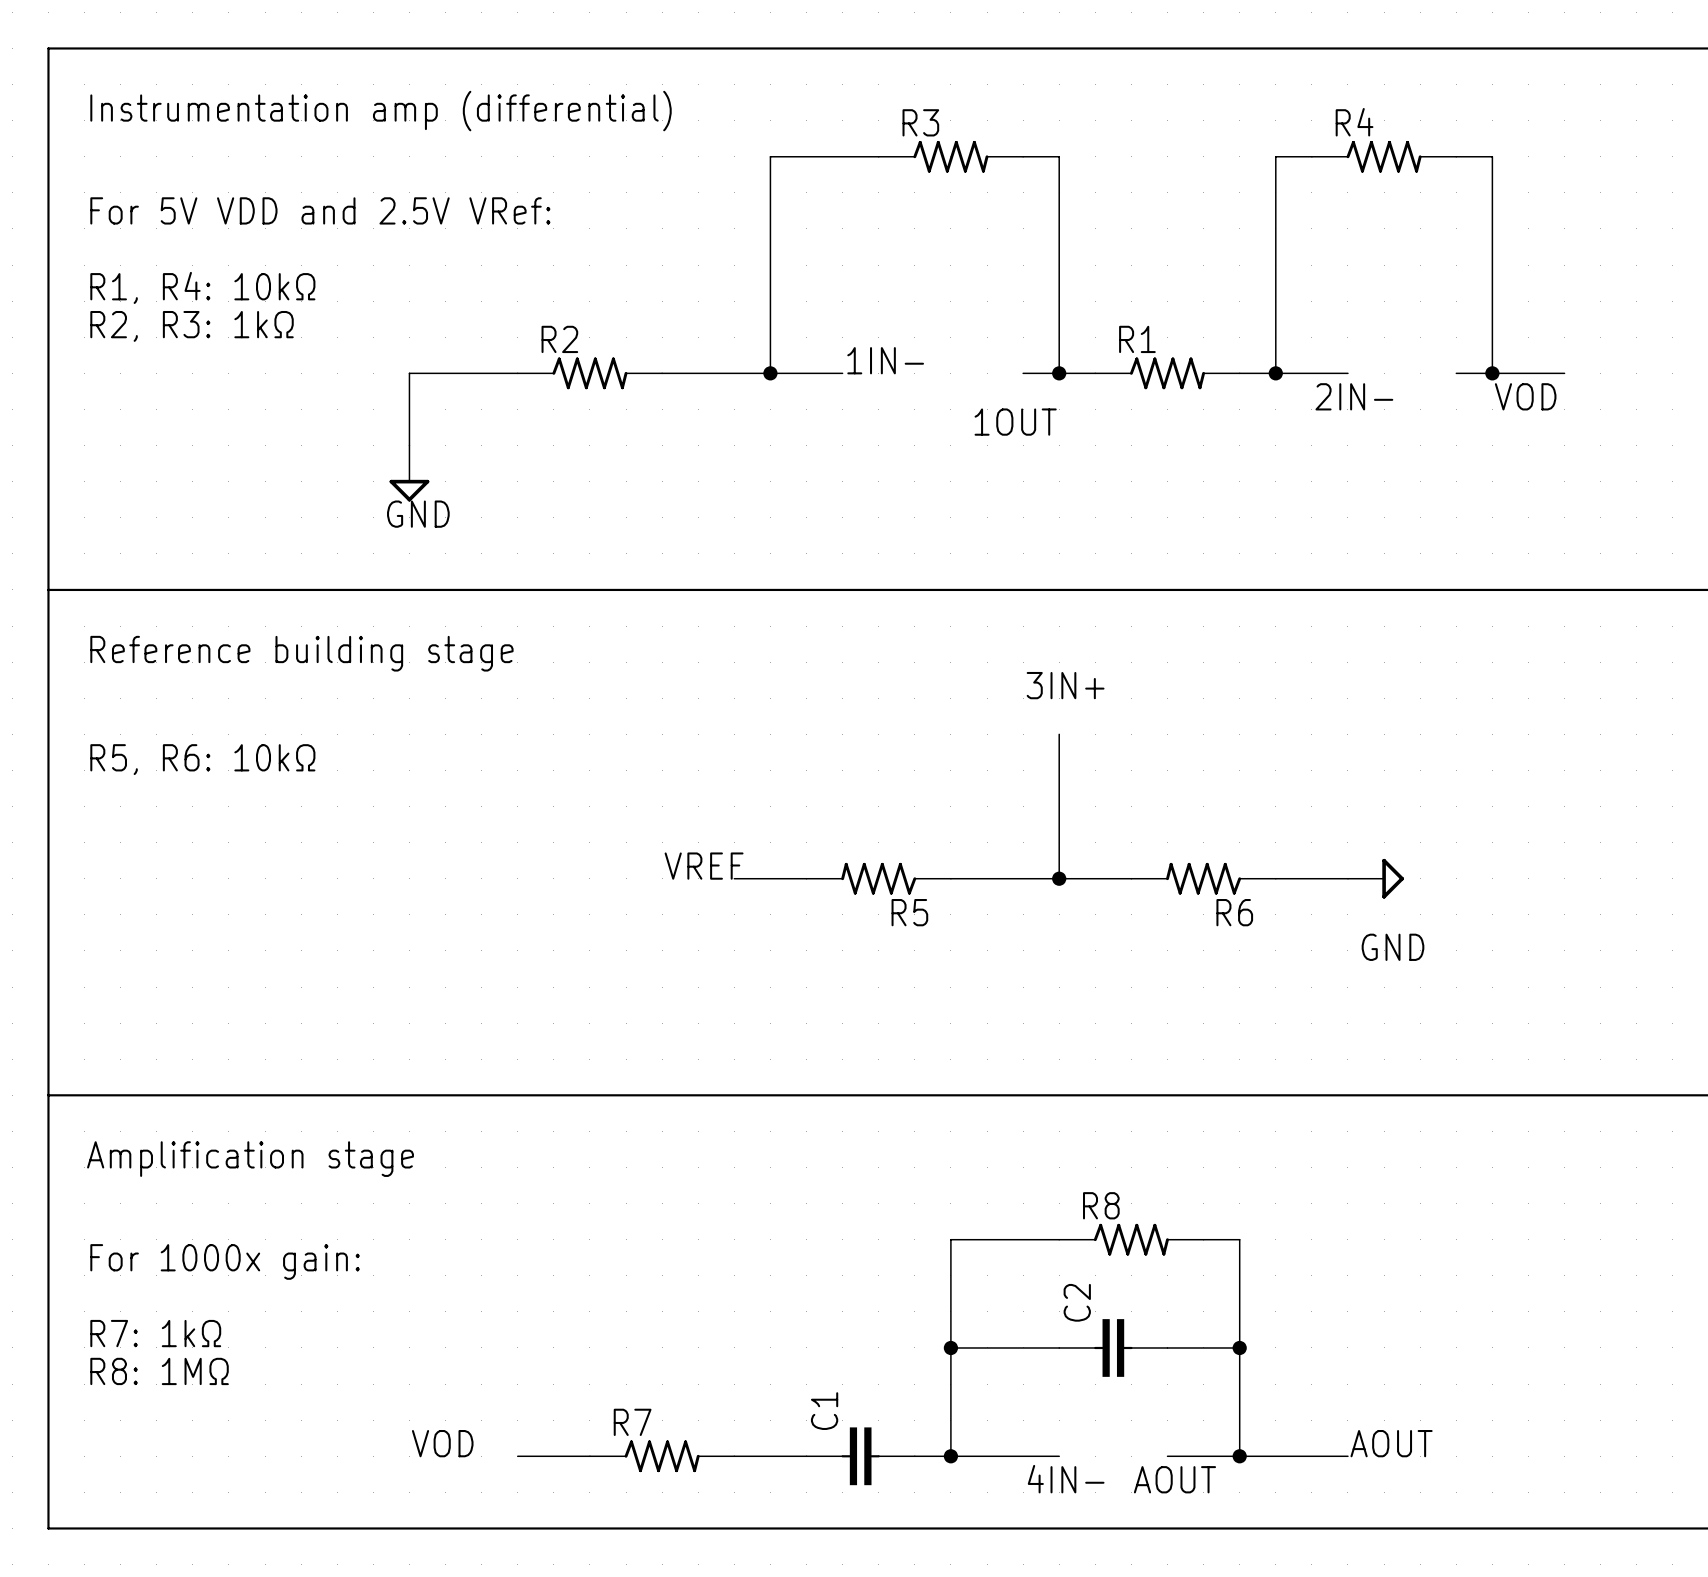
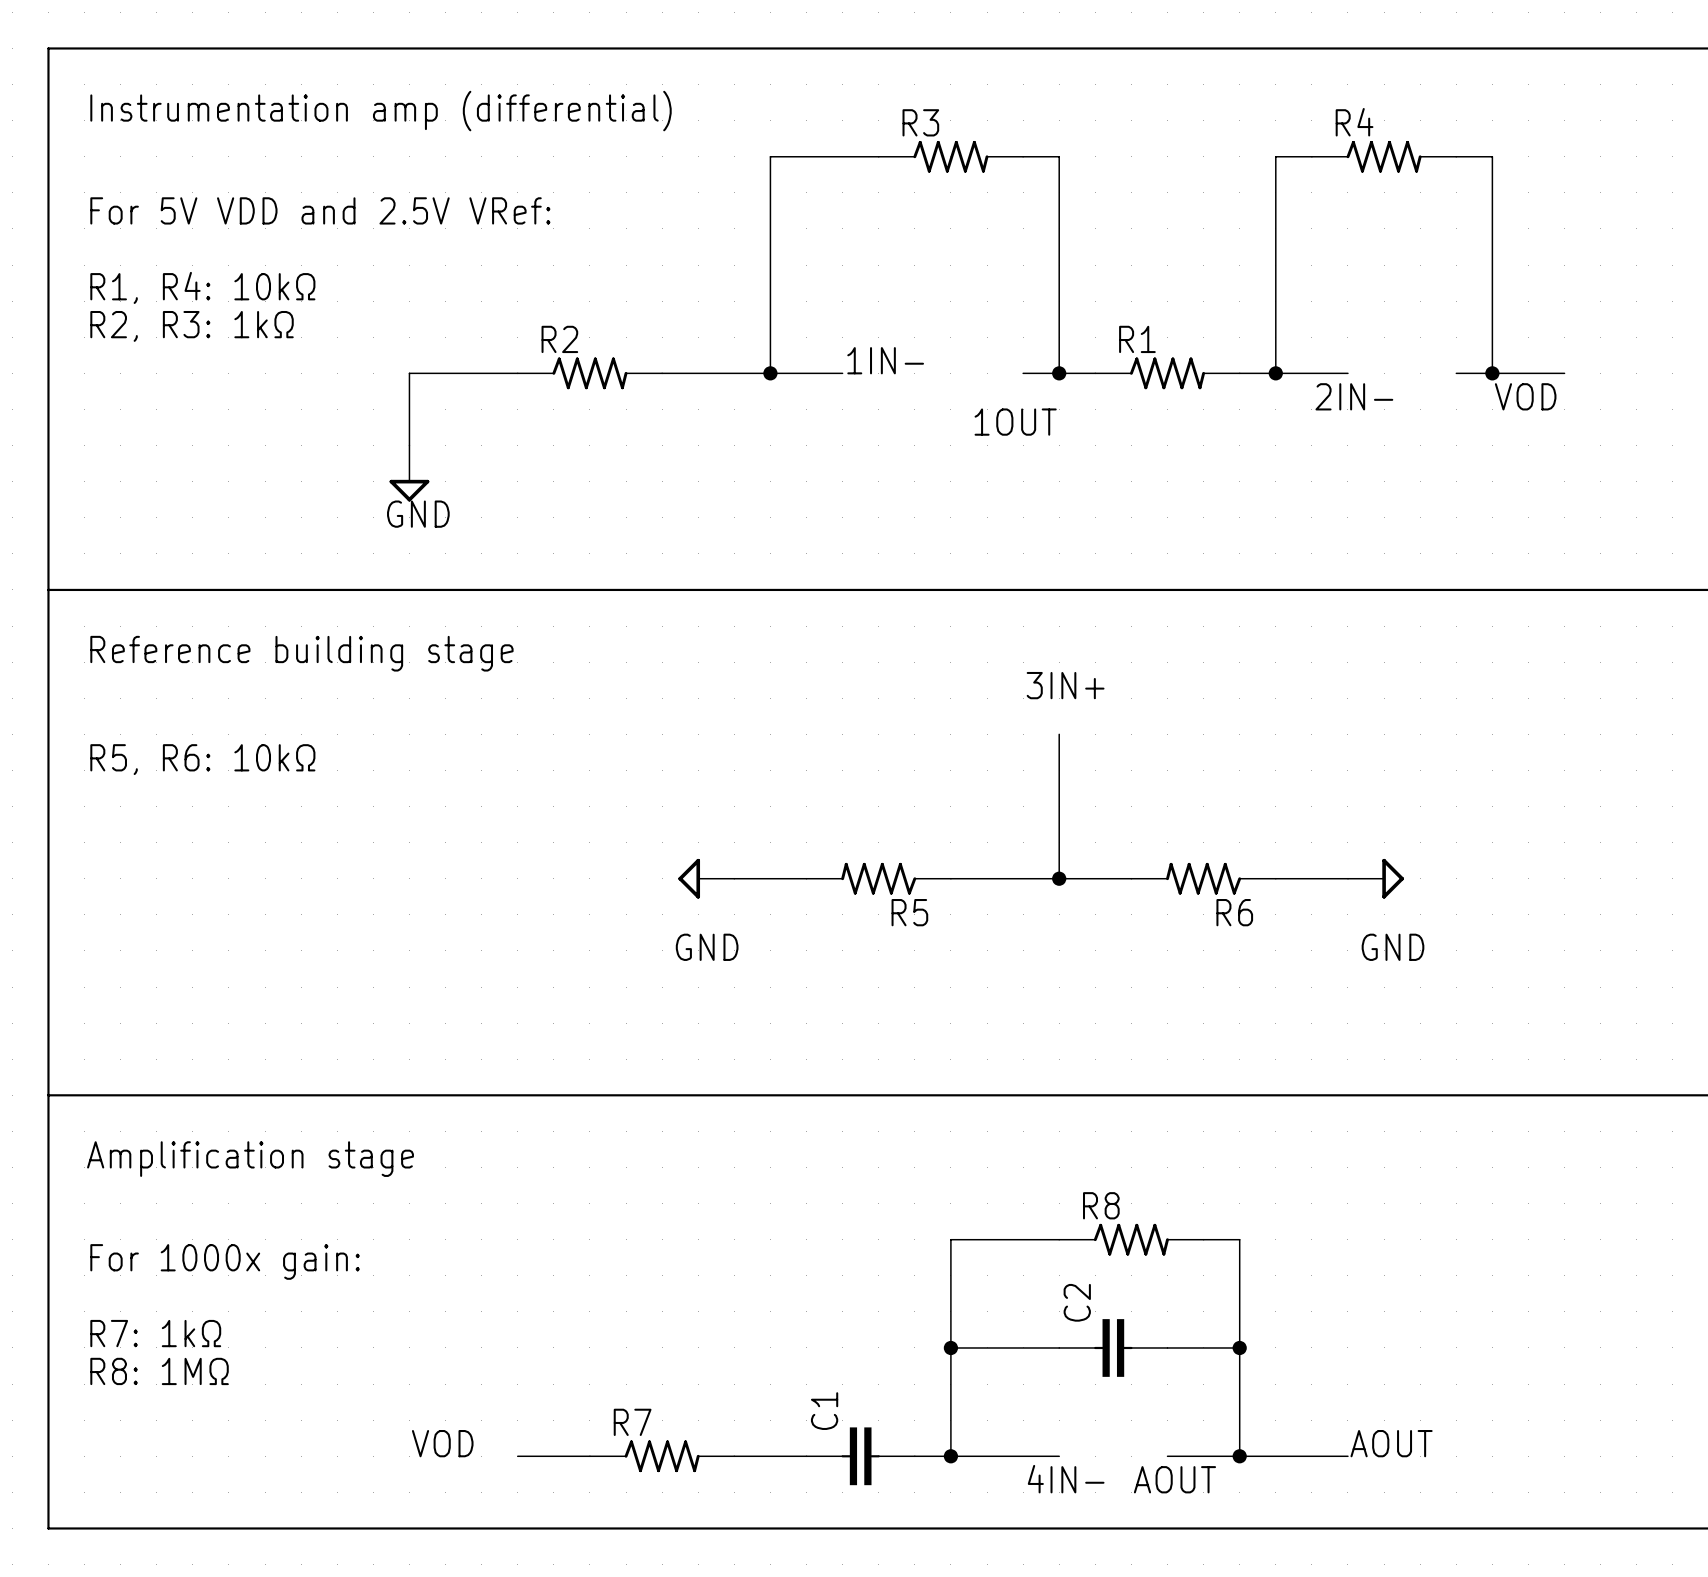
label: VREF (704, 866) -> none
power symbol: none -> GND (706, 878)

